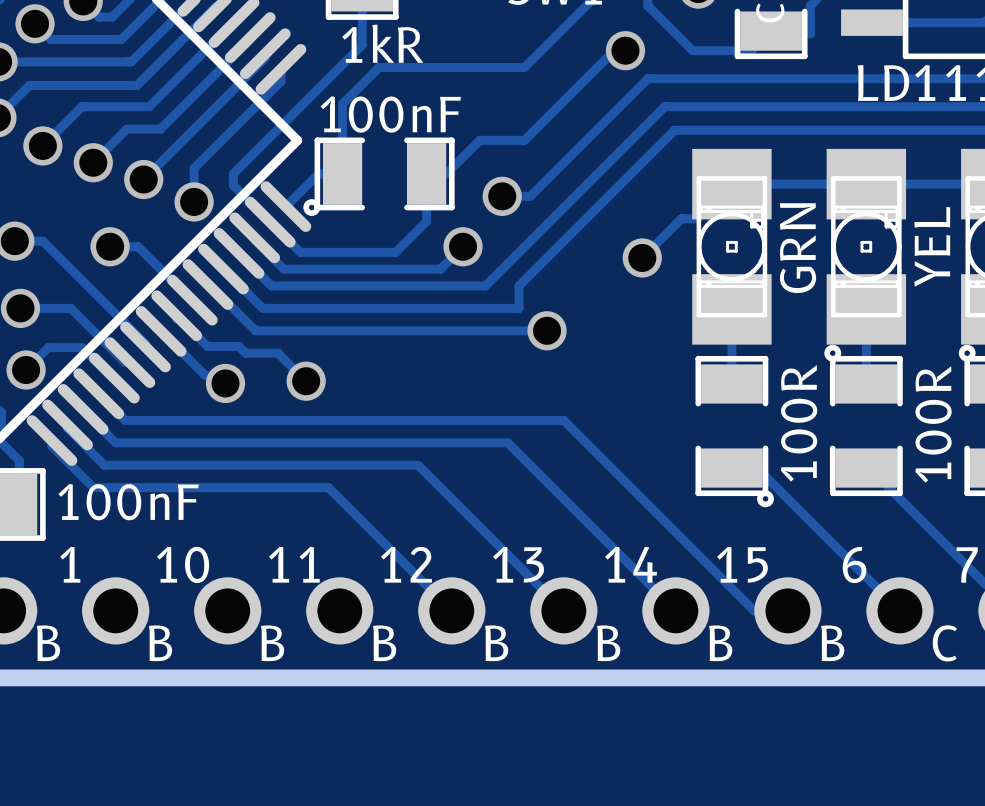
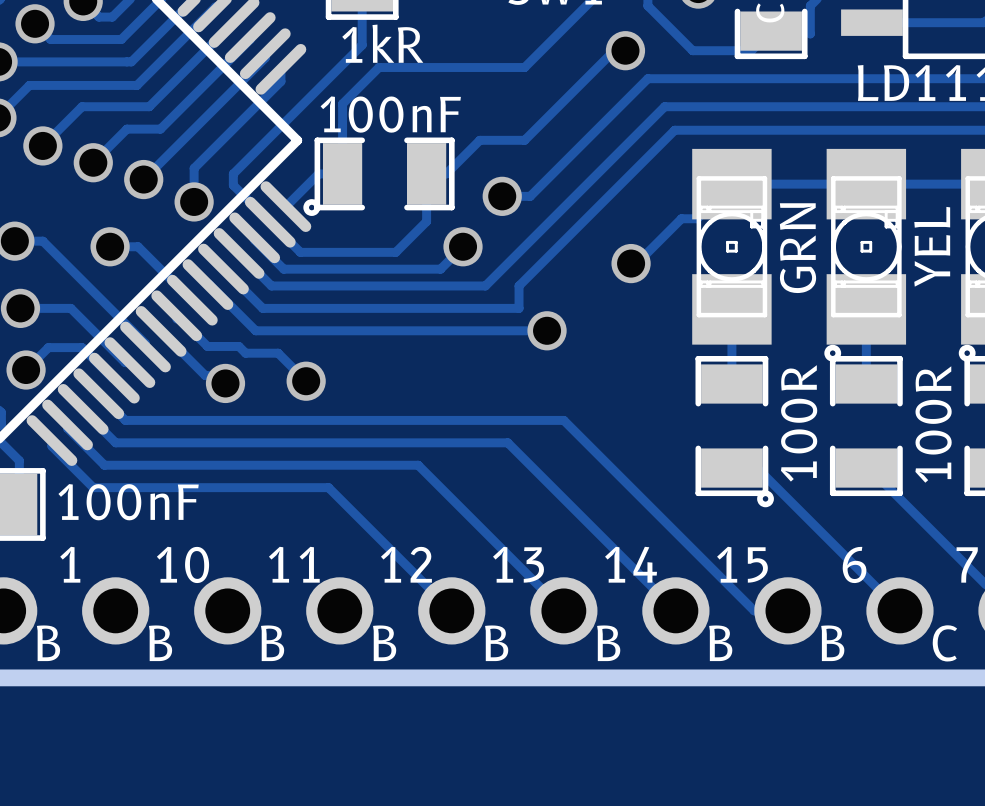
via position: (642, 257) -> (631, 263)

